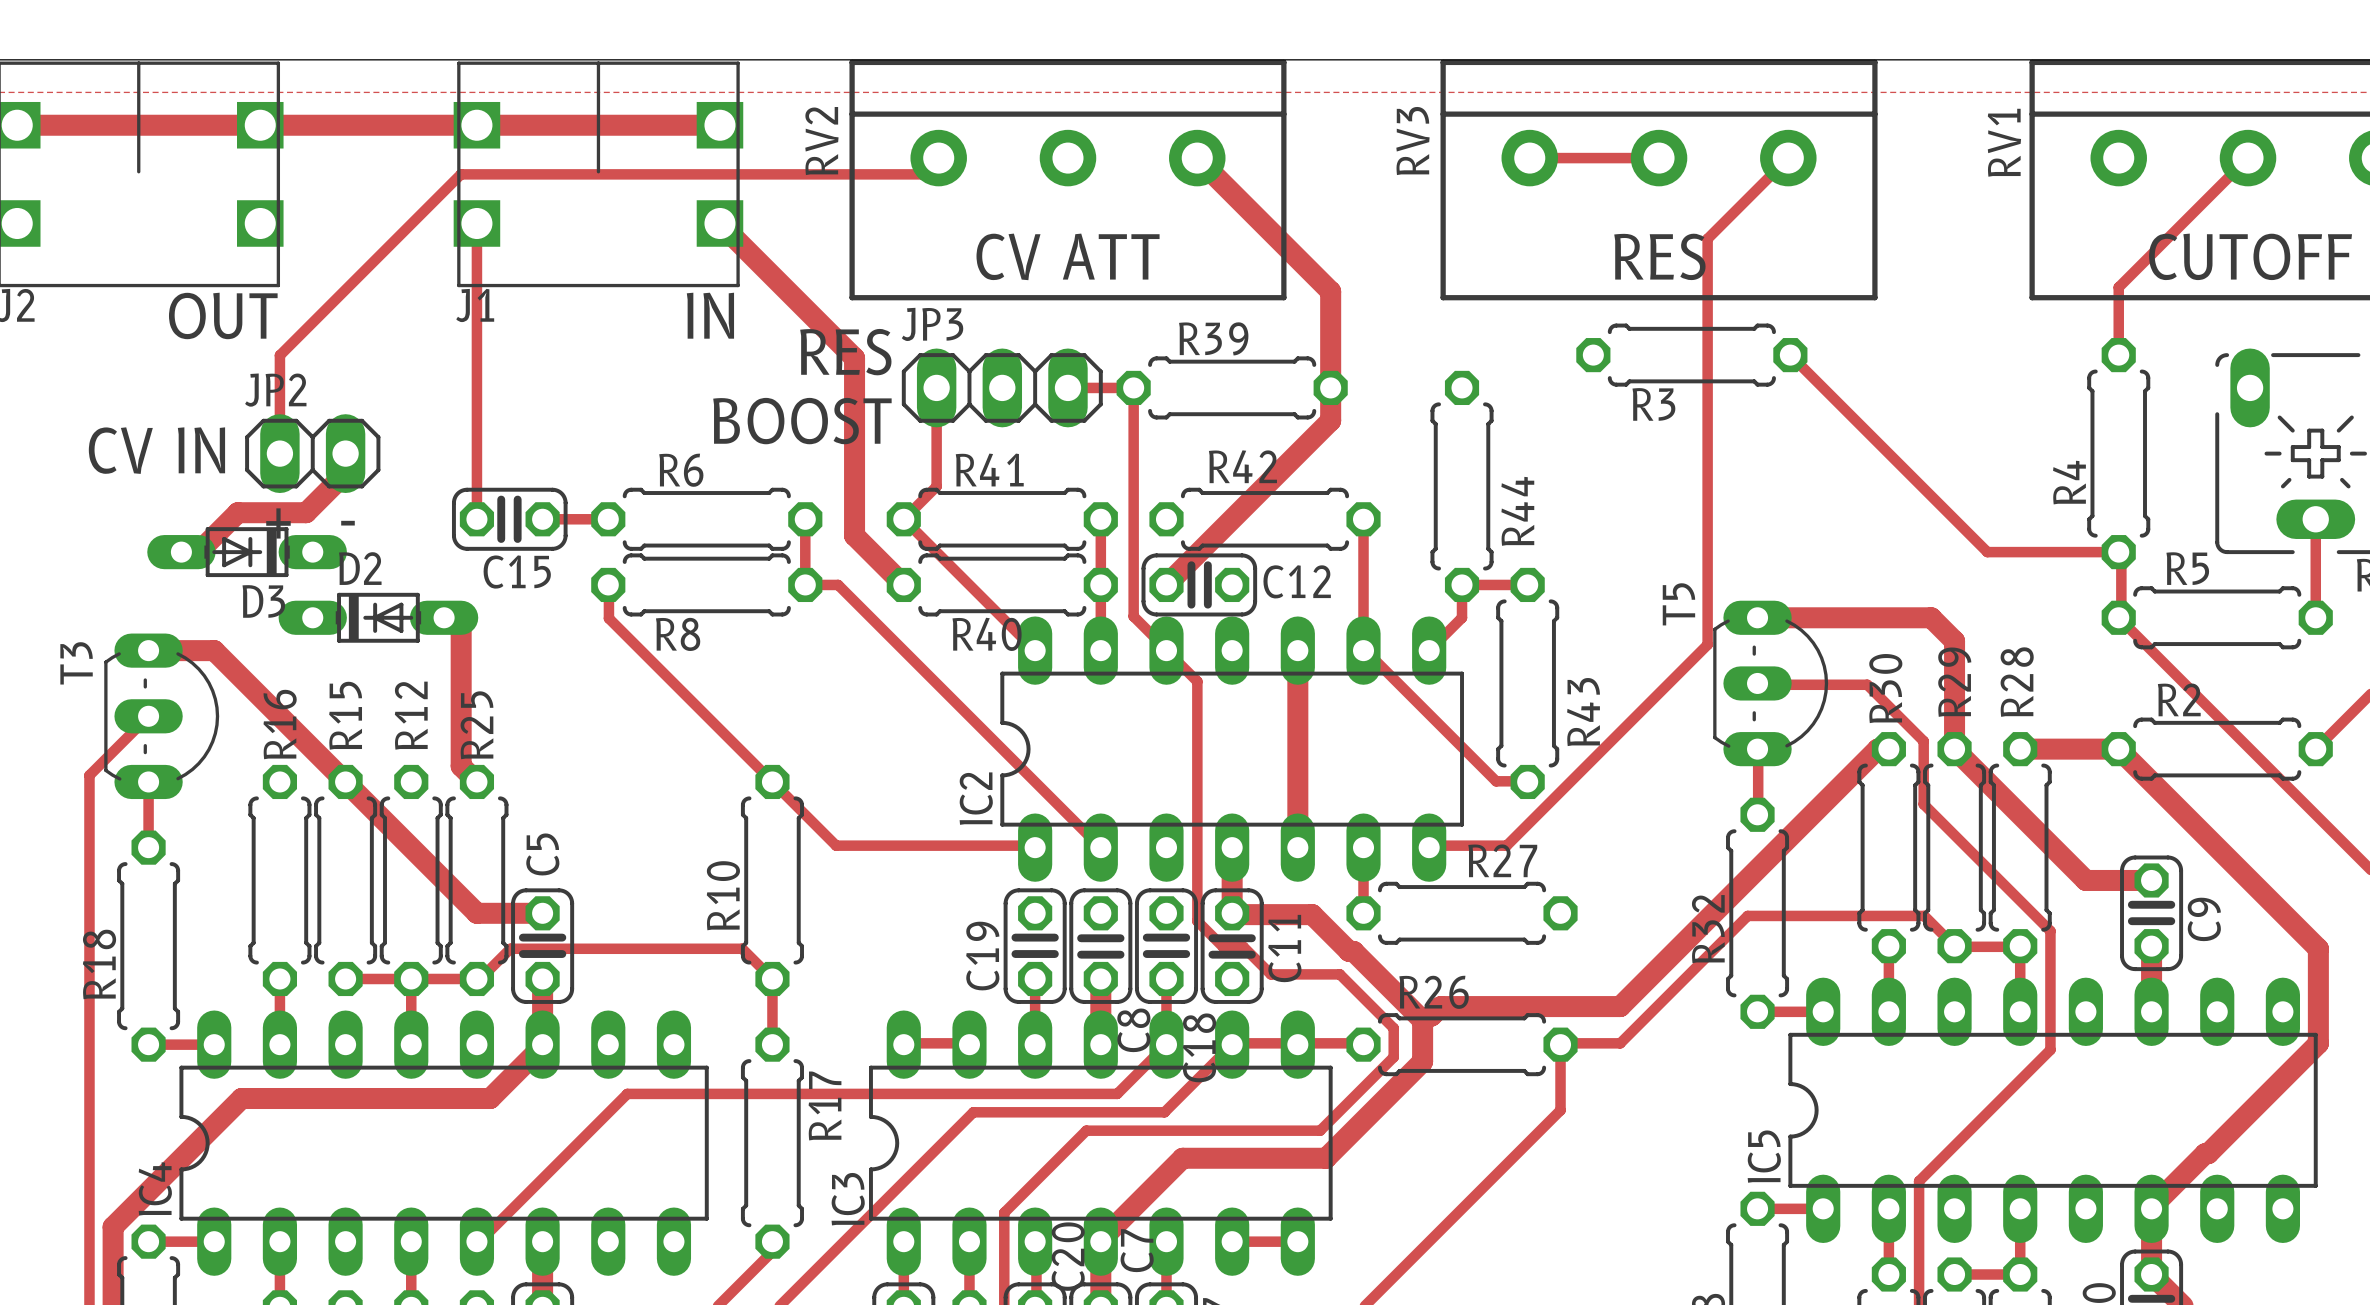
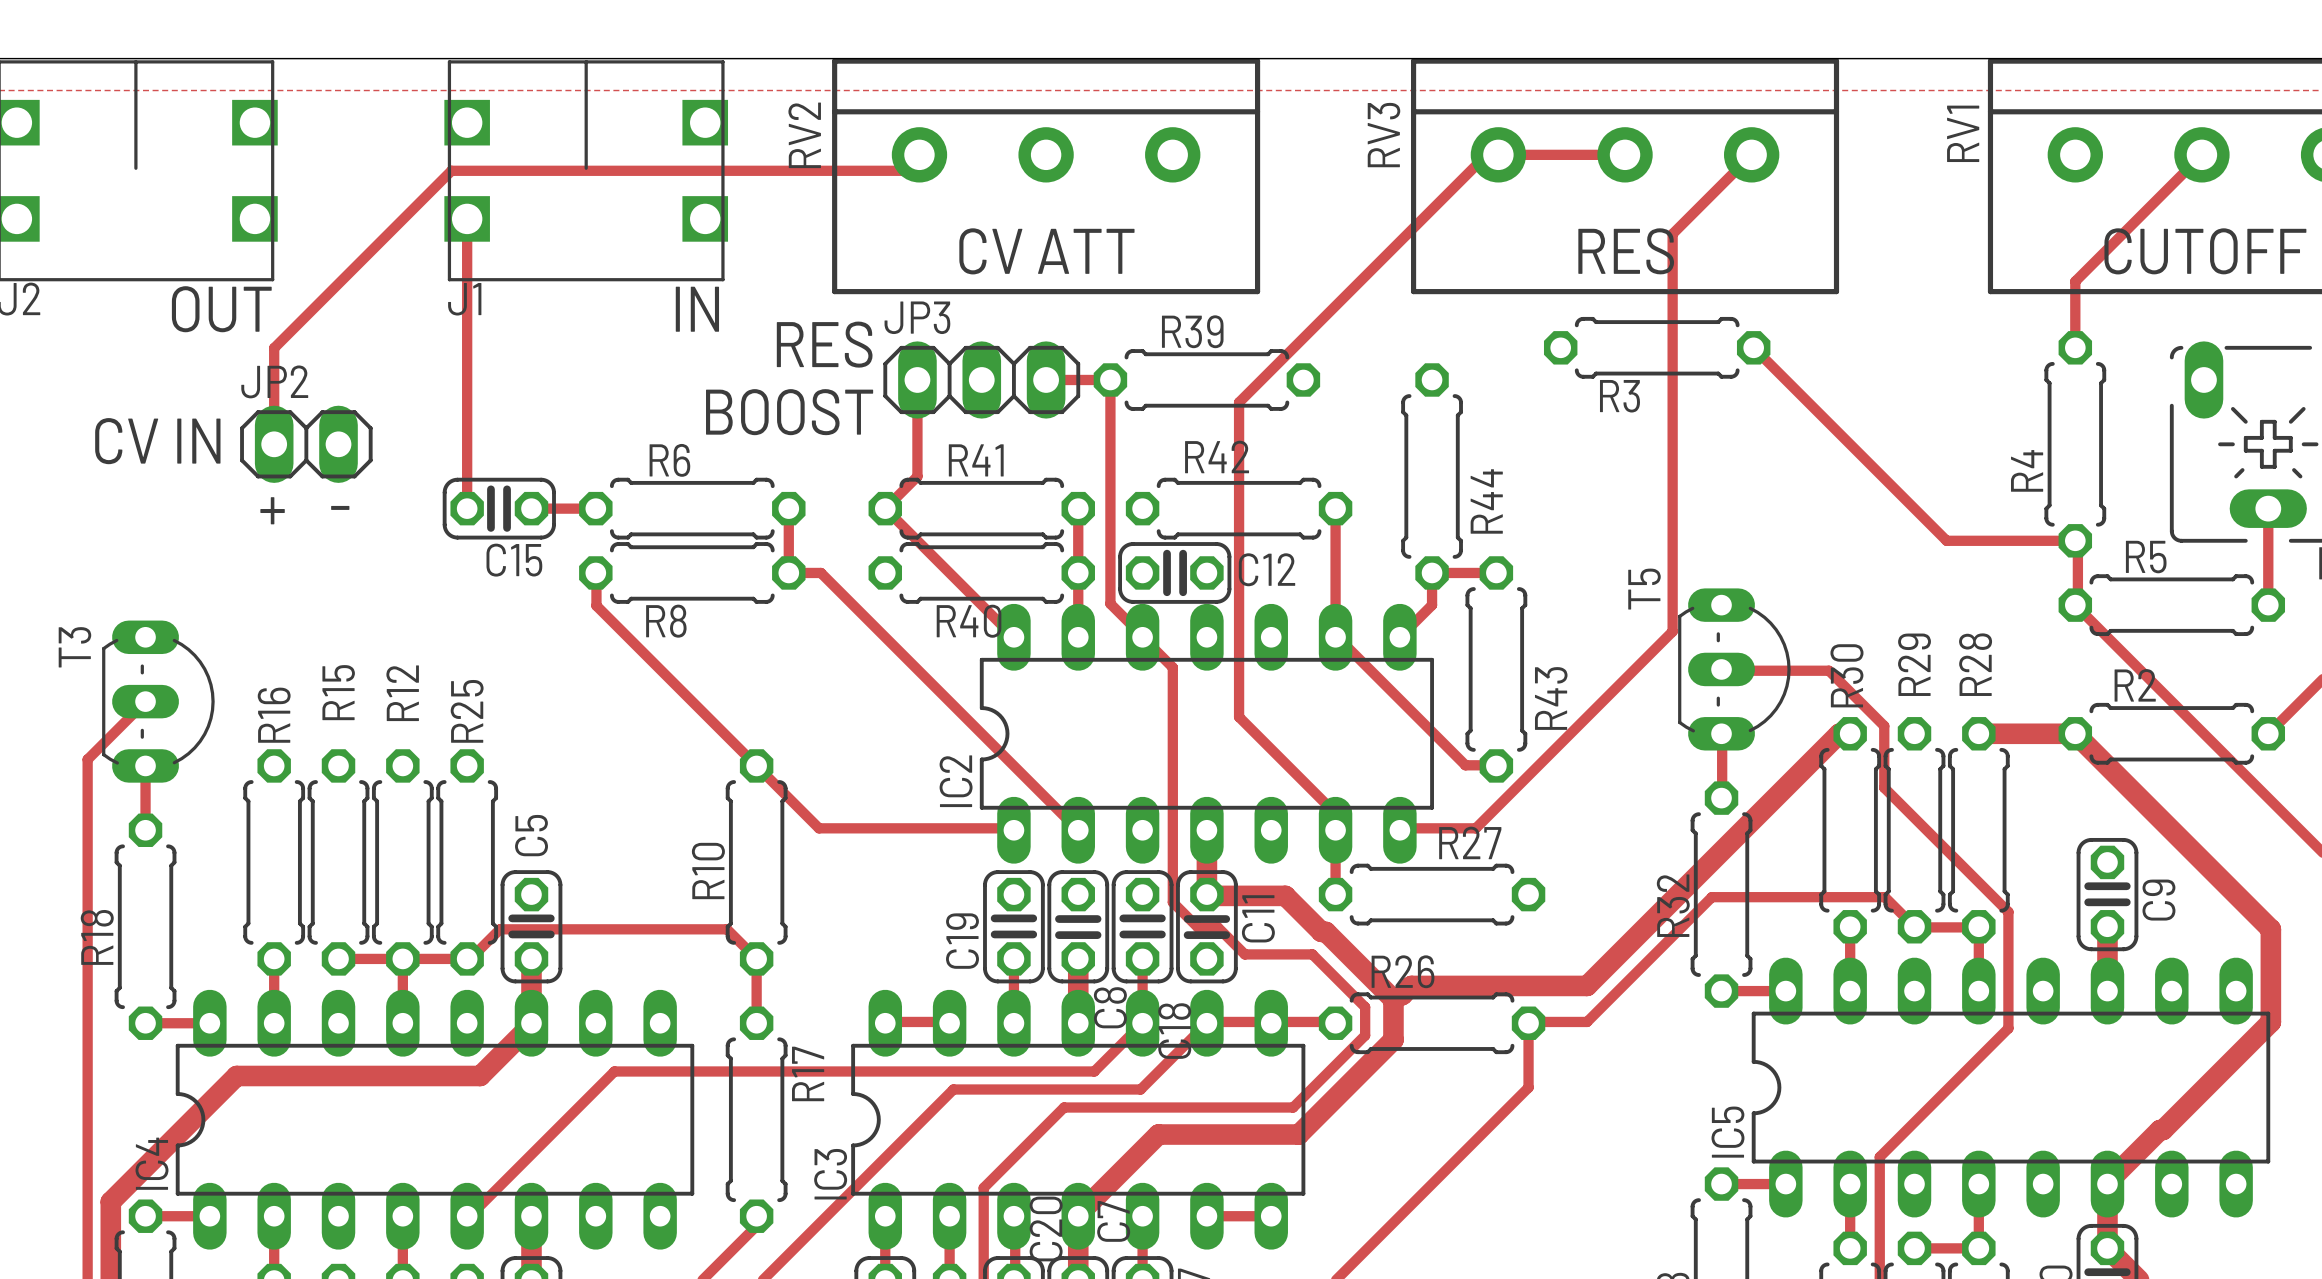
track: (17, 125) (719, 125) -> none
track: (1197, 158) (1330, 291) (1330, 420) (1166, 584) -> none
track: none -> (1486, 154) (1239, 402) (1239, 717) (1335, 813) (1335, 830)
track: (719, 223) (854, 358) (854, 535) (903, 584) -> none
track: (345, 453) (345, 473) (306, 512) (237, 512) (198, 552) (181, 552) -> none
D3: (247, 552) -> none
D2: (378, 617) -> none
track: (444, 617) (461, 617) (461, 766) (476, 781) -> none
track: (1757, 617) (1931, 617) (1954, 641) (1954, 749) (2085, 880) (2151, 880) -> none
track: (148, 650) (214, 650) (476, 913) (542, 913) -> none
track: (1297, 650) (1297, 847) -> none

